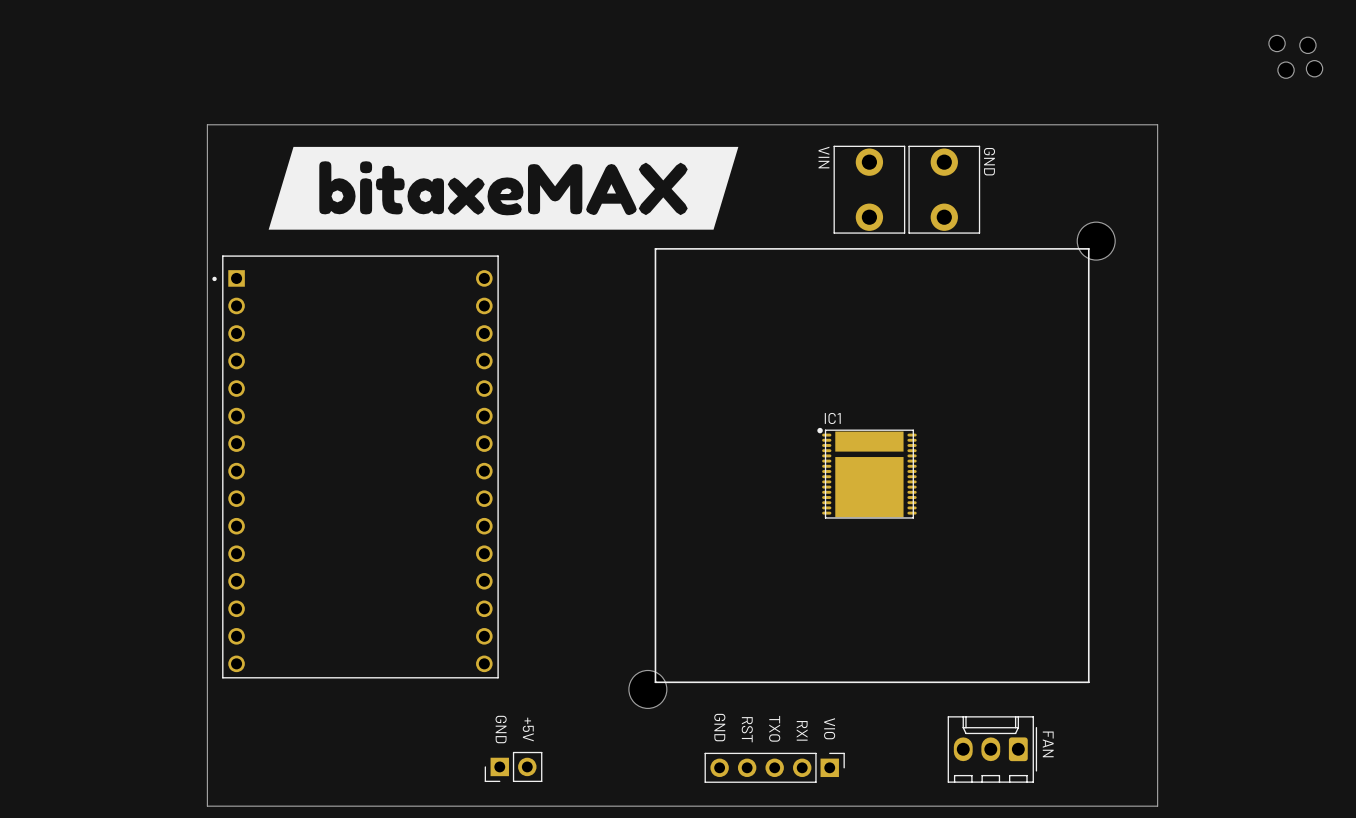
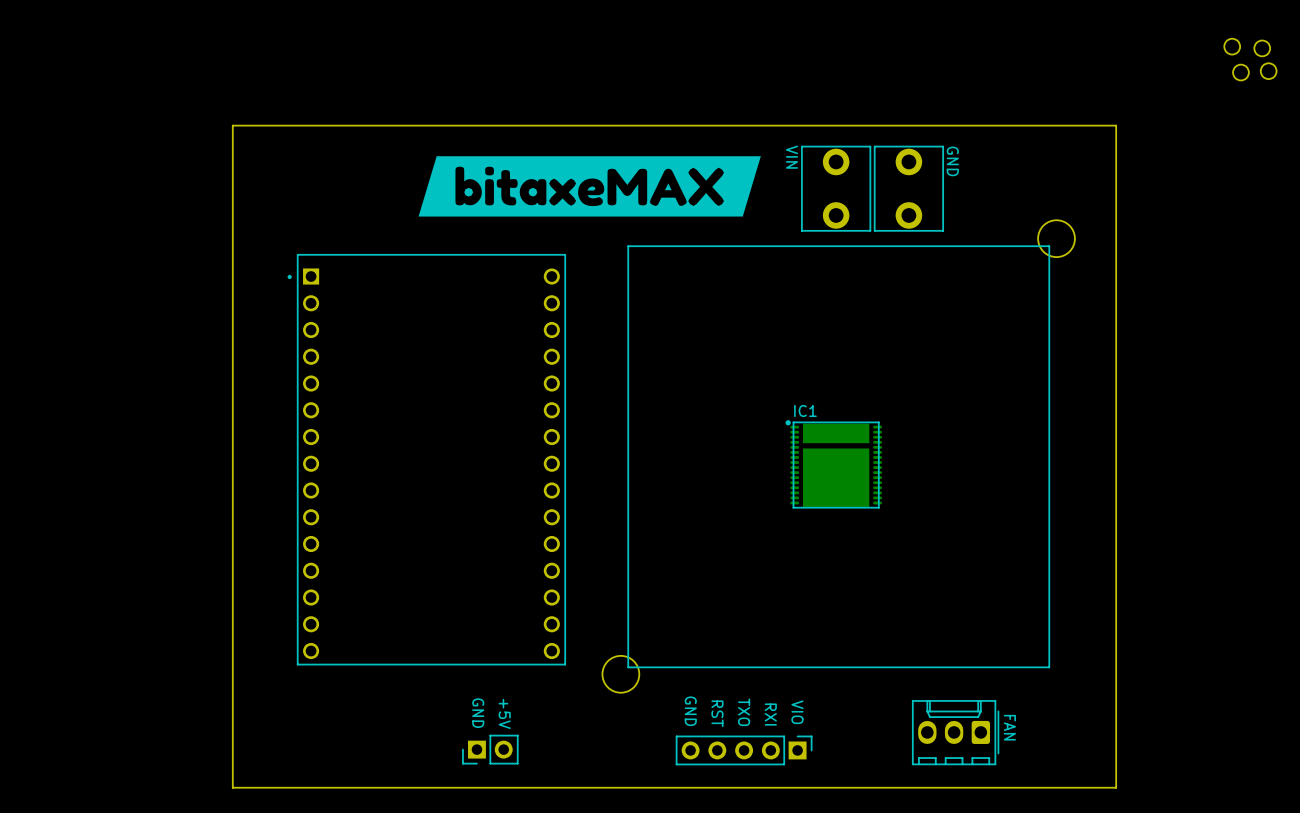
board edge: (248, 124) (207, 124) (207, 806) (248, 806) -> (232, 125) (232, 787)
drawing: [268, 146, 739, 230] -> none
drawing: none -> [418, 156, 761, 217]
part position: (355, 466) -> (426, 459)

